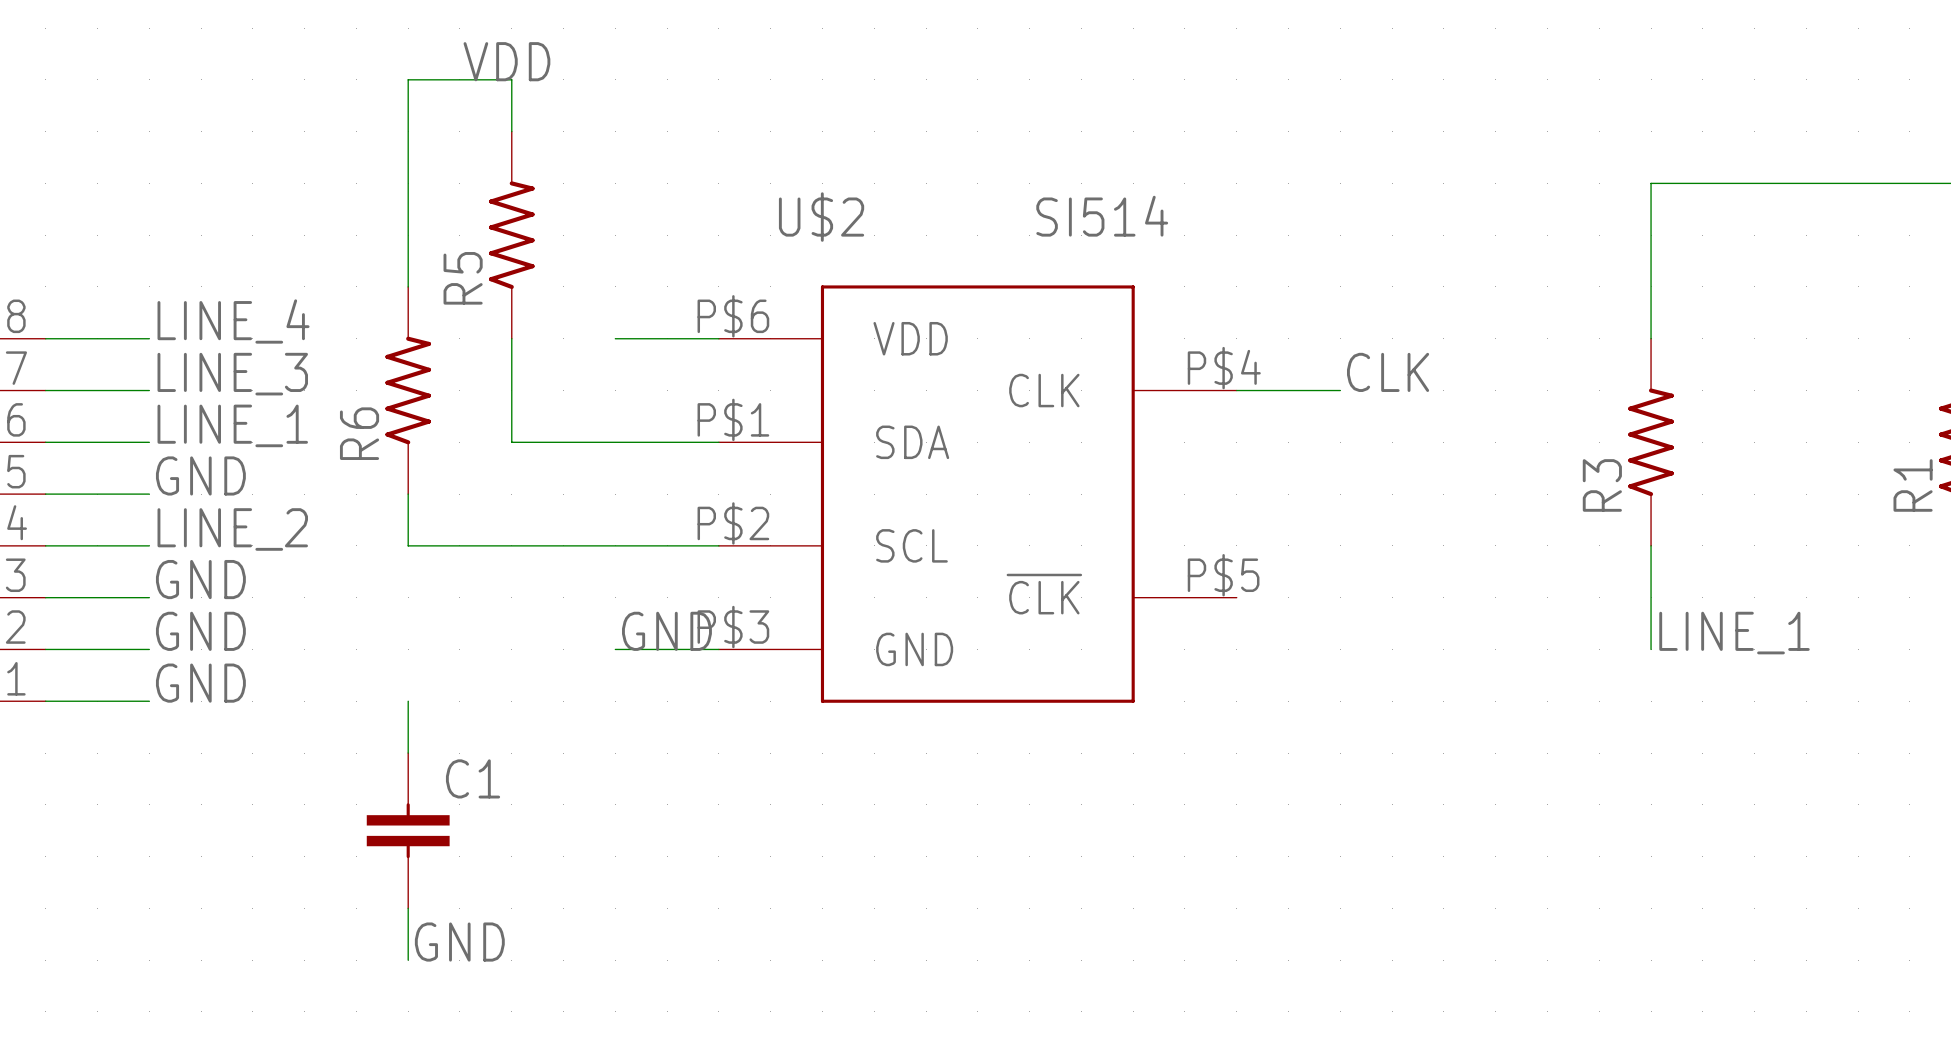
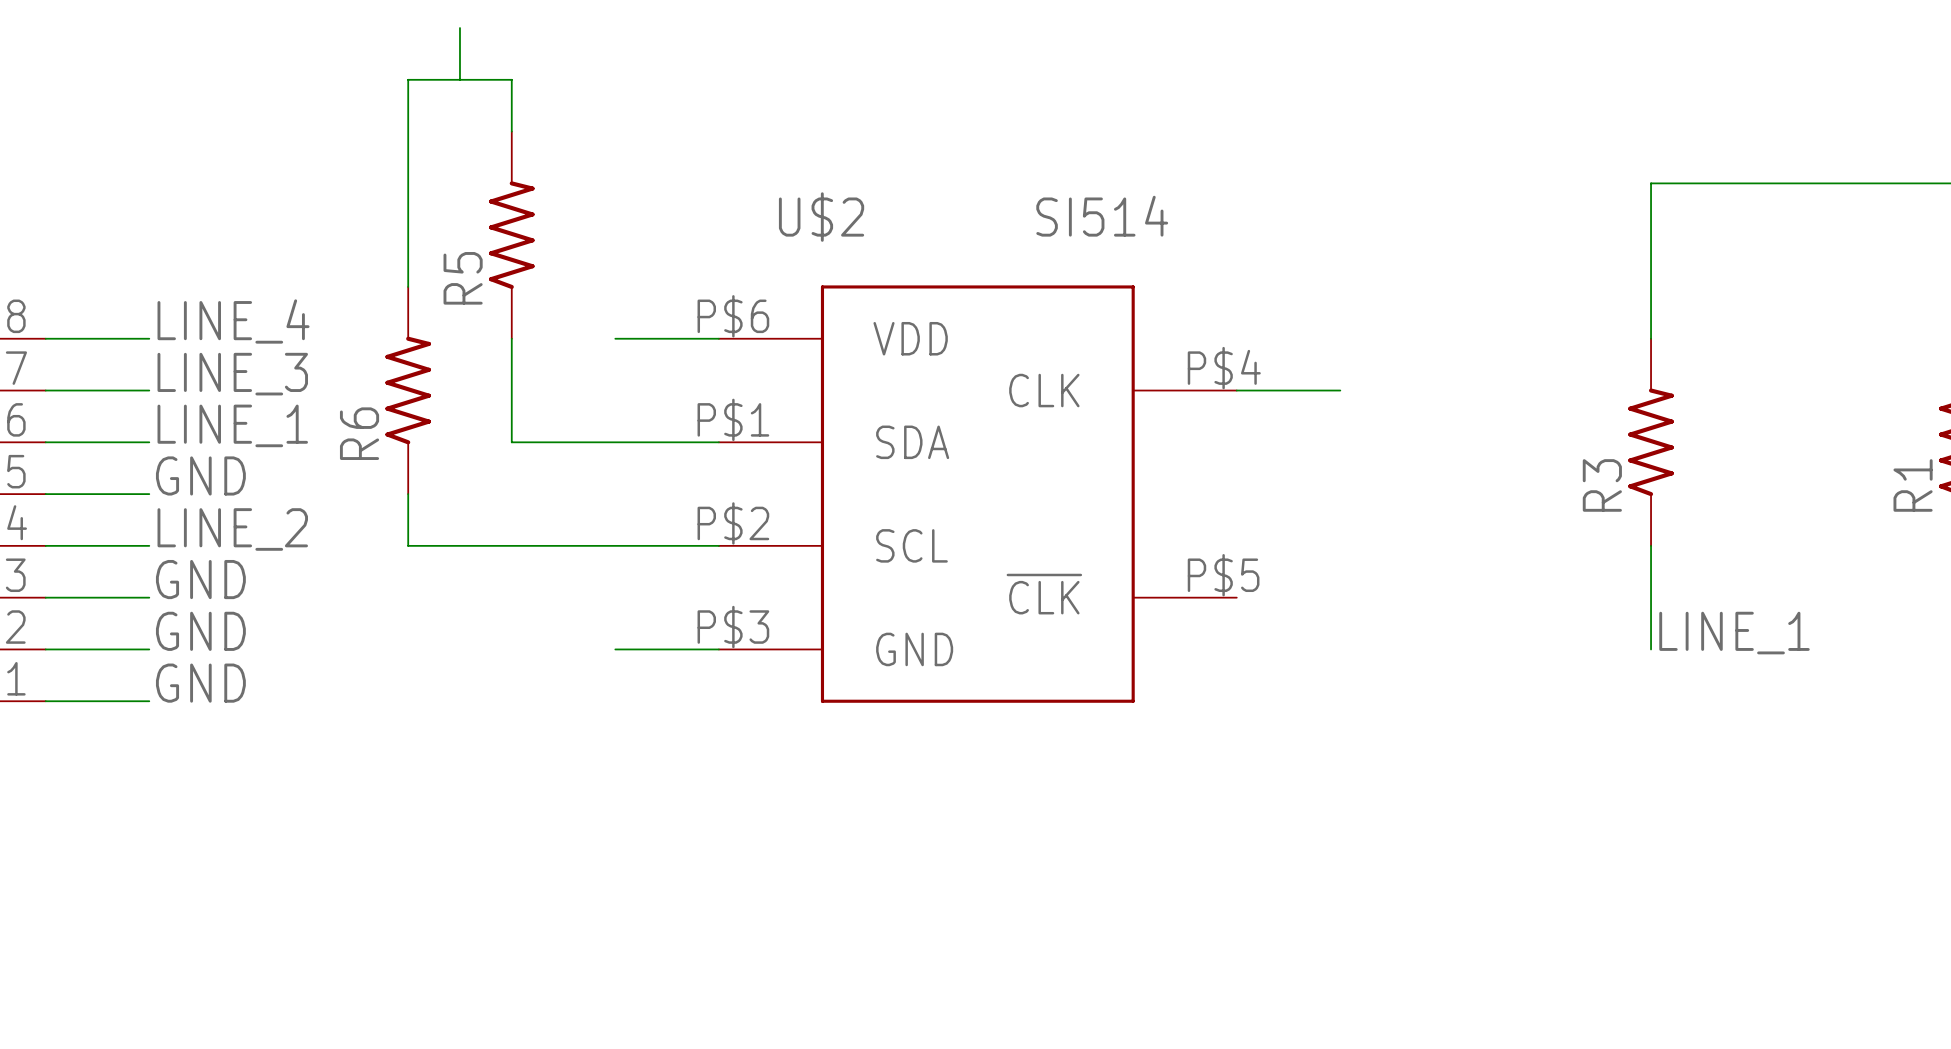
wire: none -> (459, 28) (459, 79)
label: VDD (506, 61) -> none
label: CLK (1388, 372) -> none
label: GND (666, 631) -> none
wire: (408, 701) (408, 753) -> none
C1: (408, 830) -> none
wire: (408, 908) (408, 960) -> none
label: GND (459, 942) -> none

